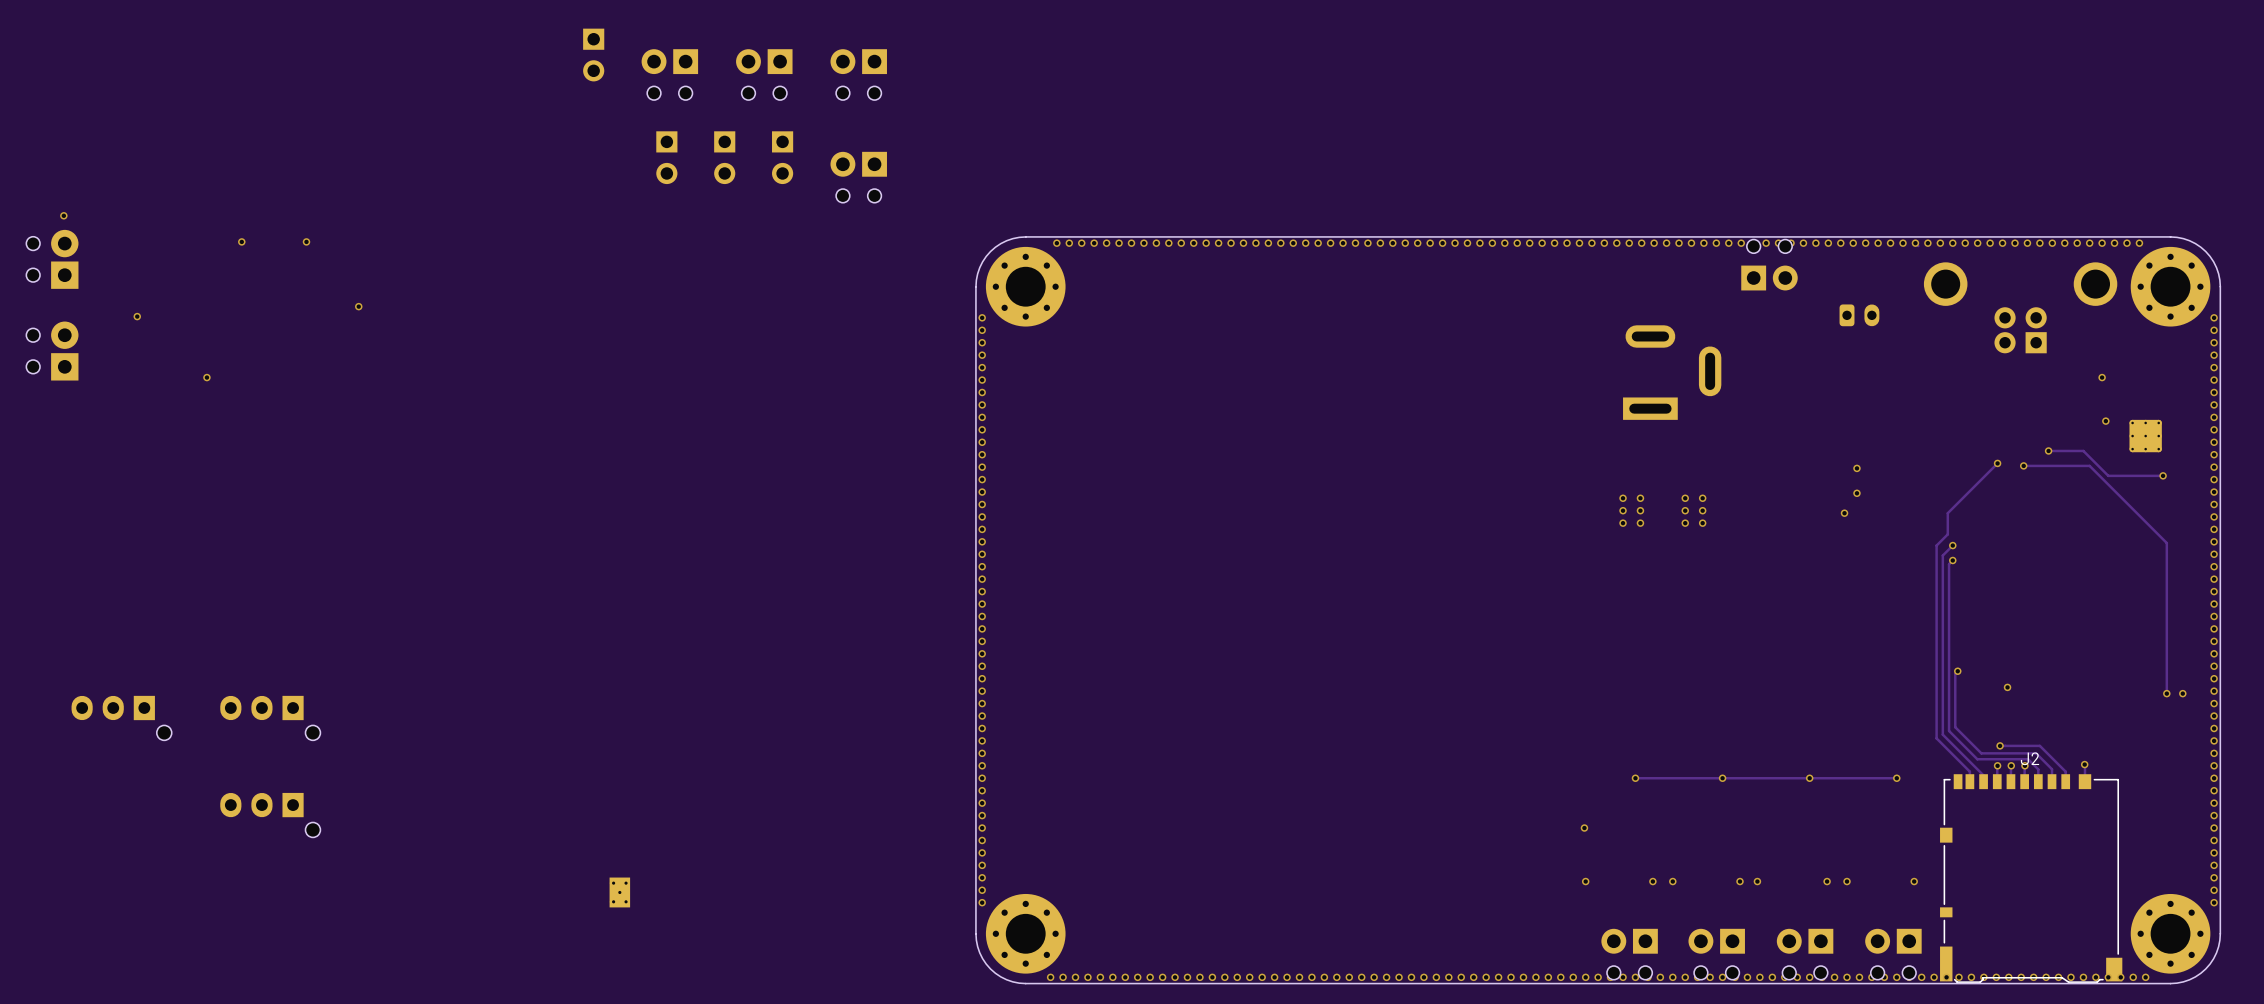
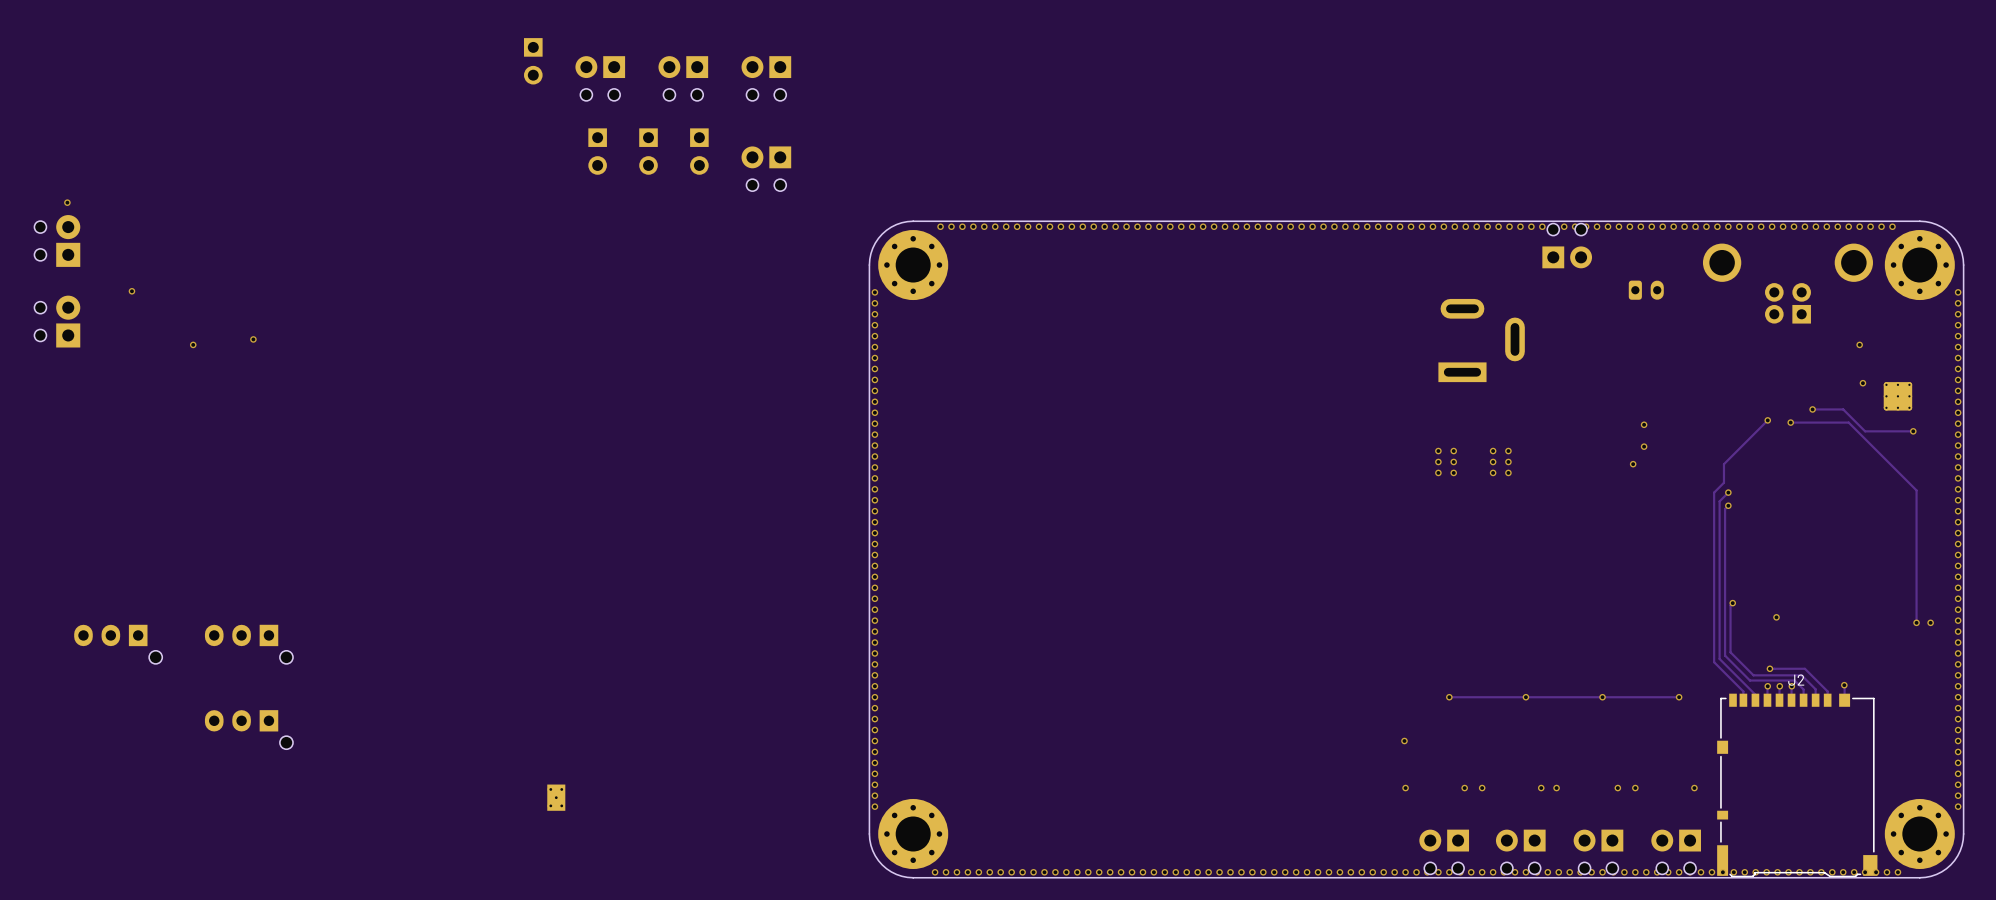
via: (241, 241) -> none
via: (306, 241) -> none
via: (358, 306) -> none
via: none -> (253, 339)

